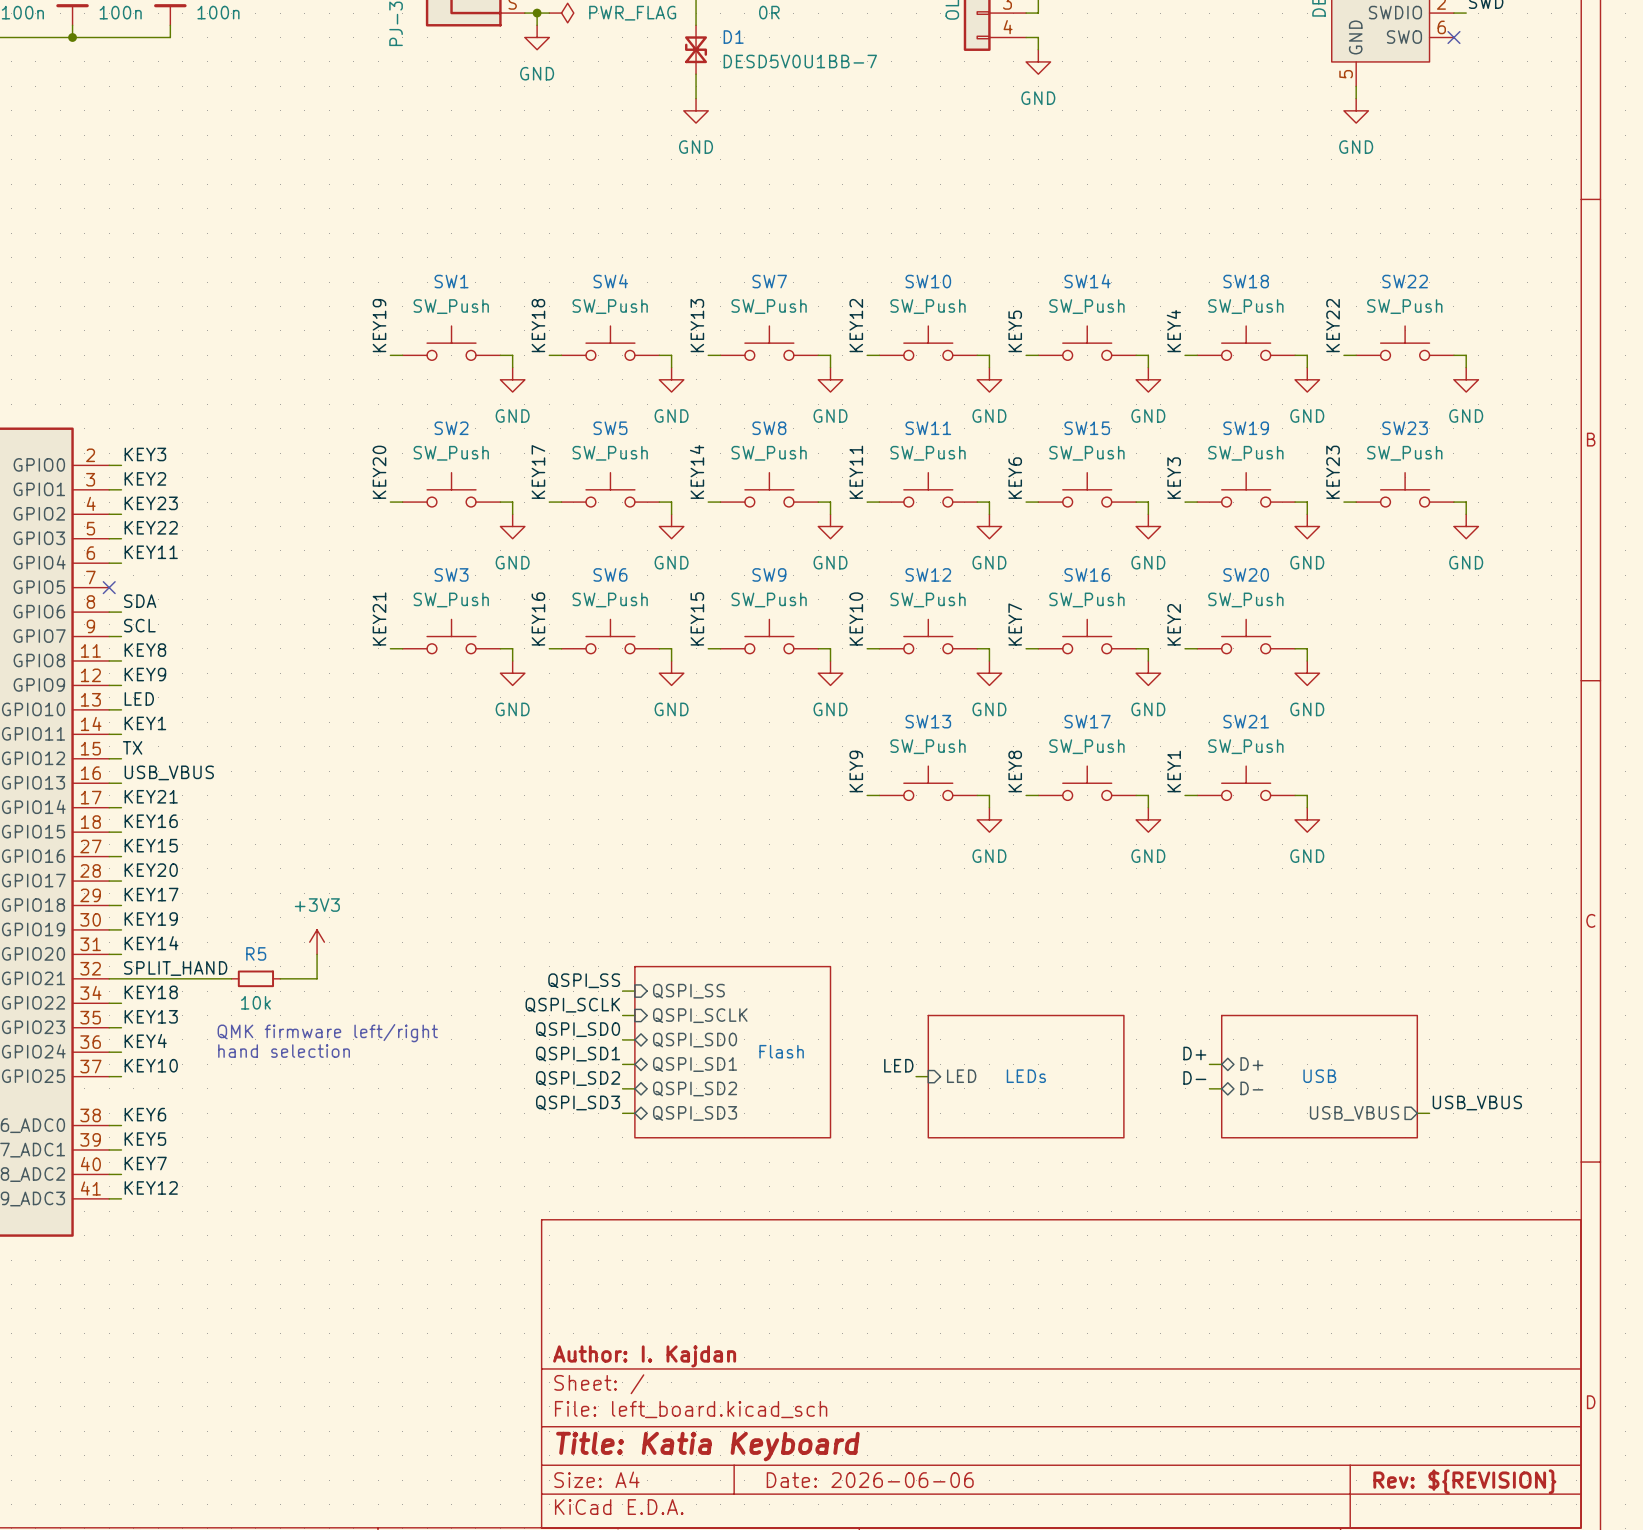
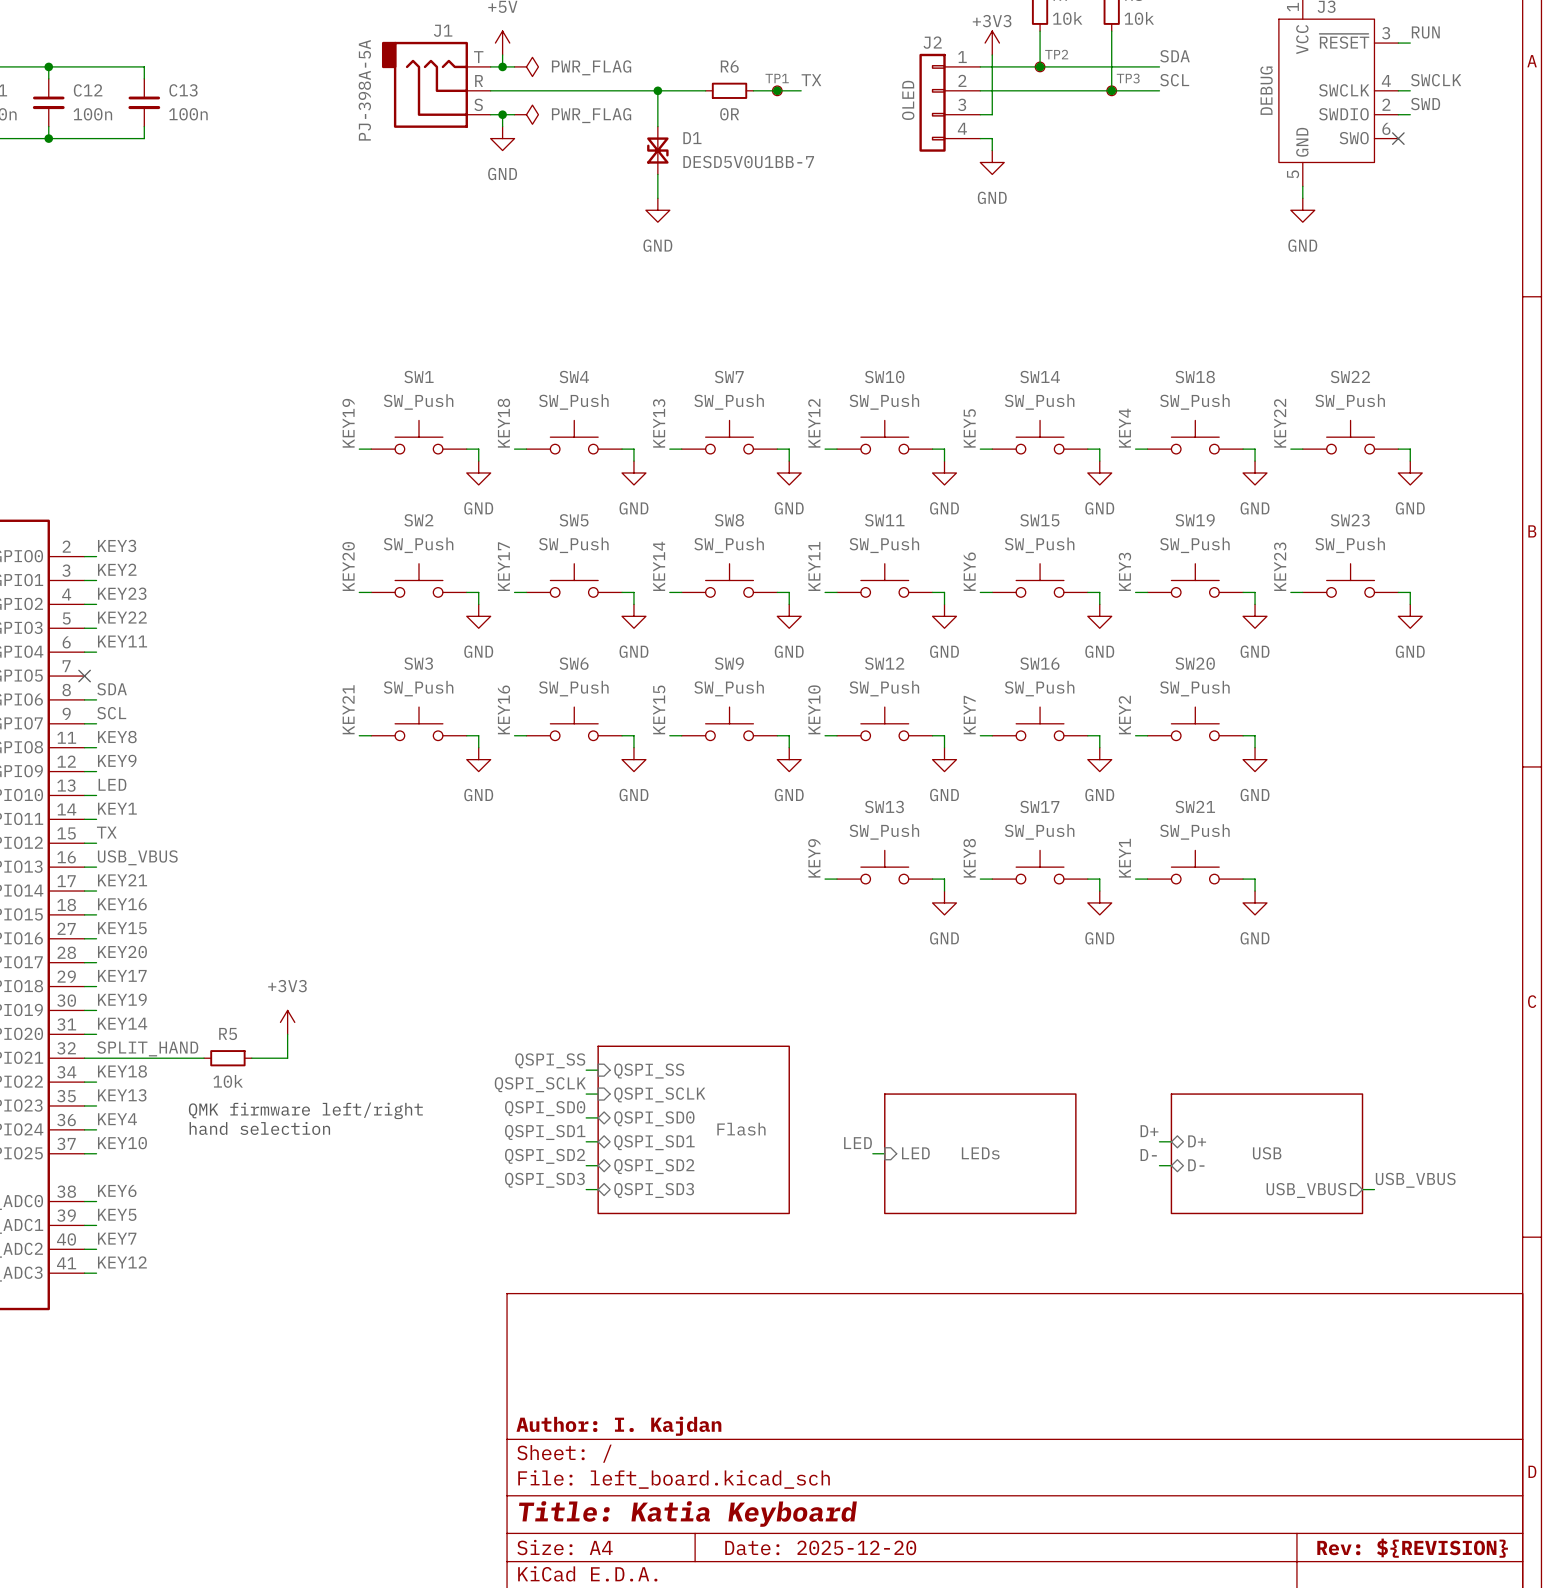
title block: Date: 2026-06-06 (870, 1480) -> Date: 2025-12-20 (820, 1547)

